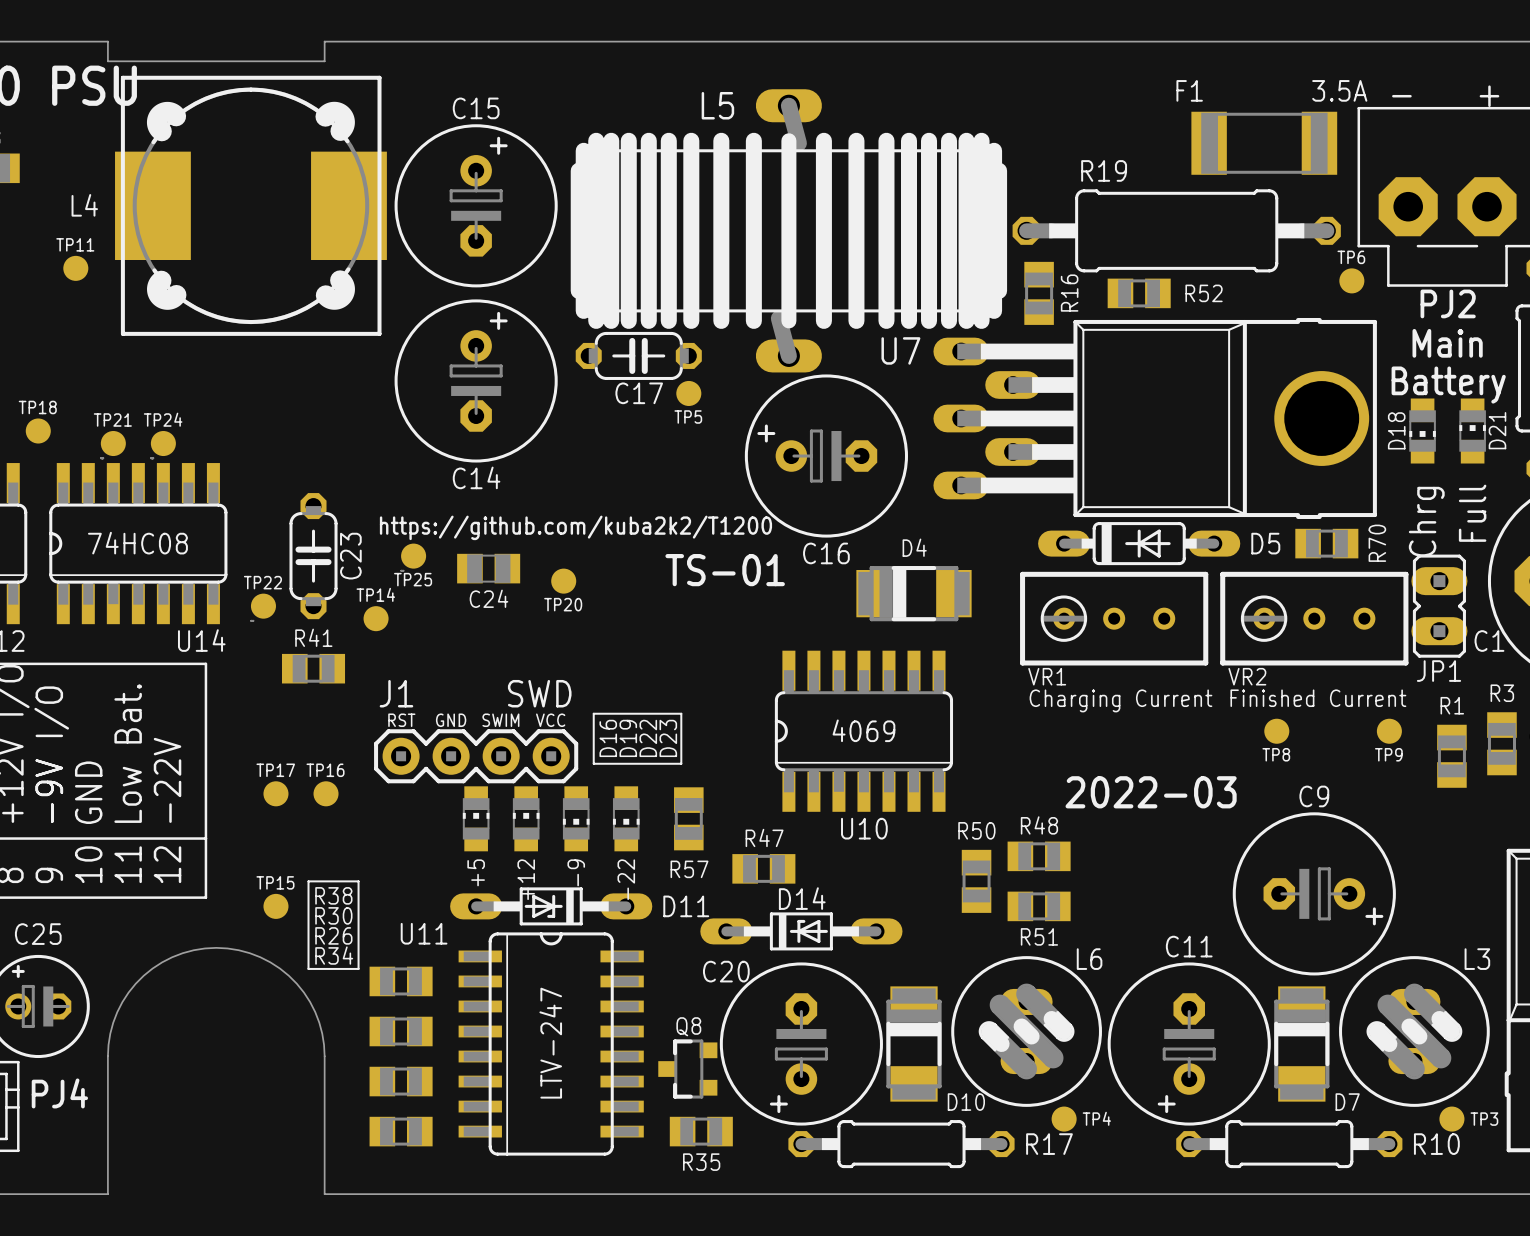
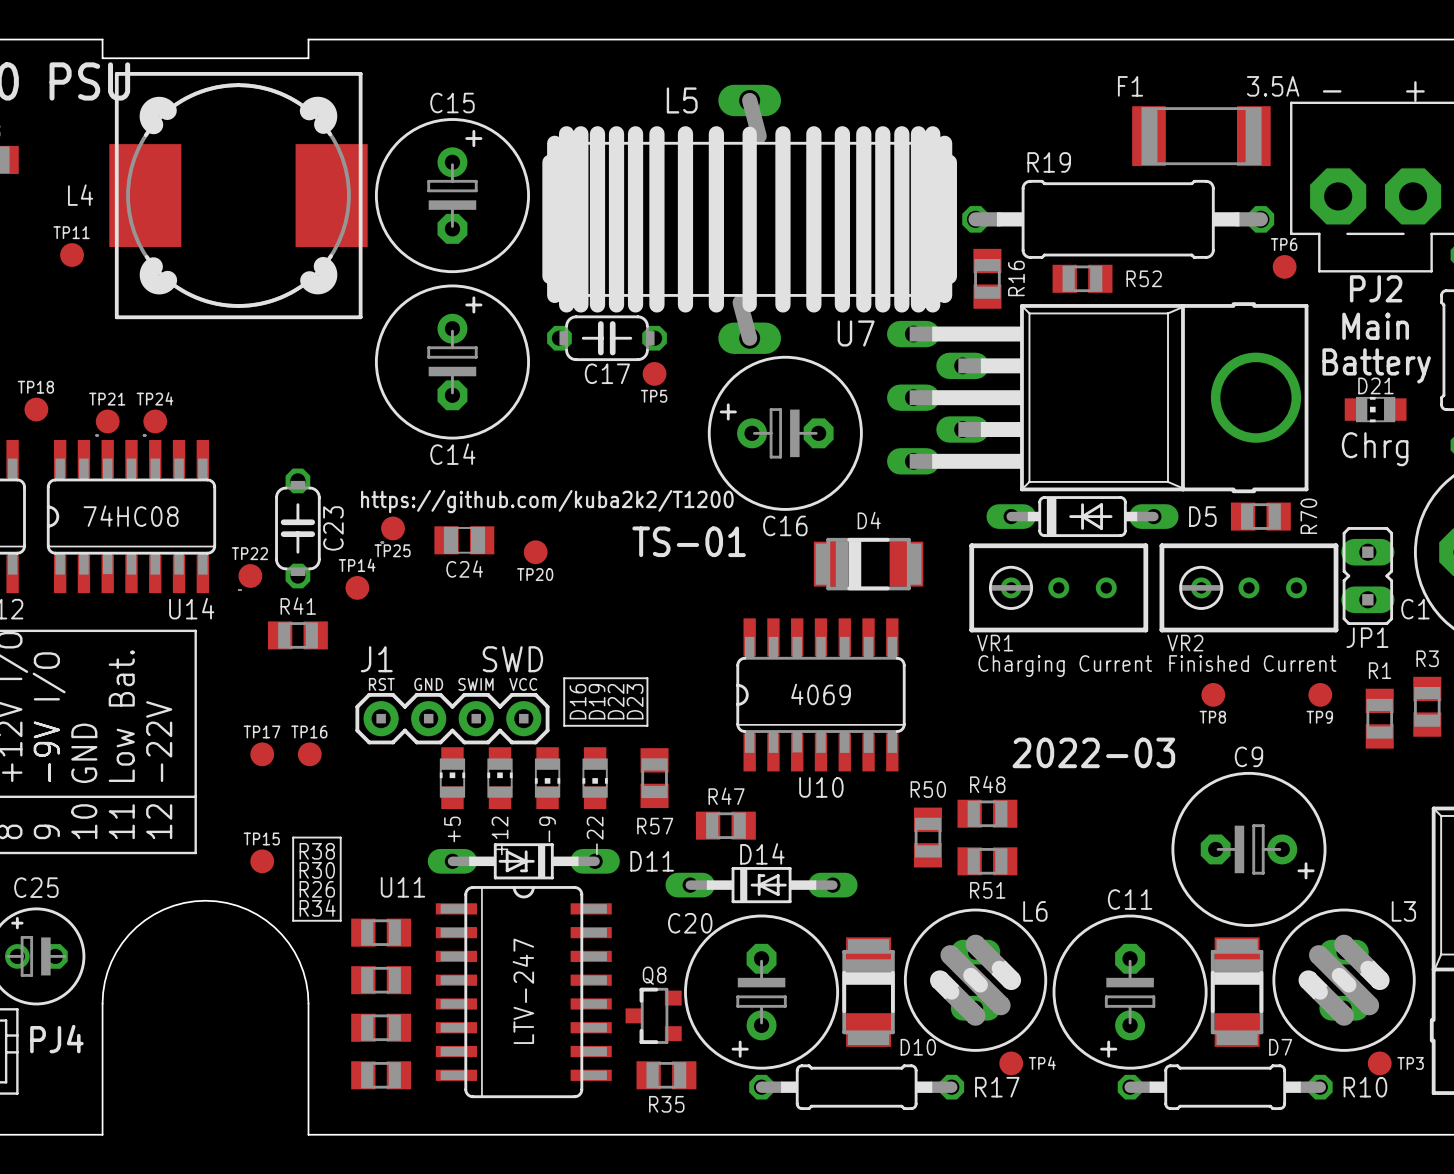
D18: (1422, 431) -> none
D21 rotation: 0° (1472, 431) -> 90° counterclockwise (1375, 409)
text: Full (1472, 513) -> none
text rotation: 0° (1426, 521) -> 90° clockwise (1375, 449)

